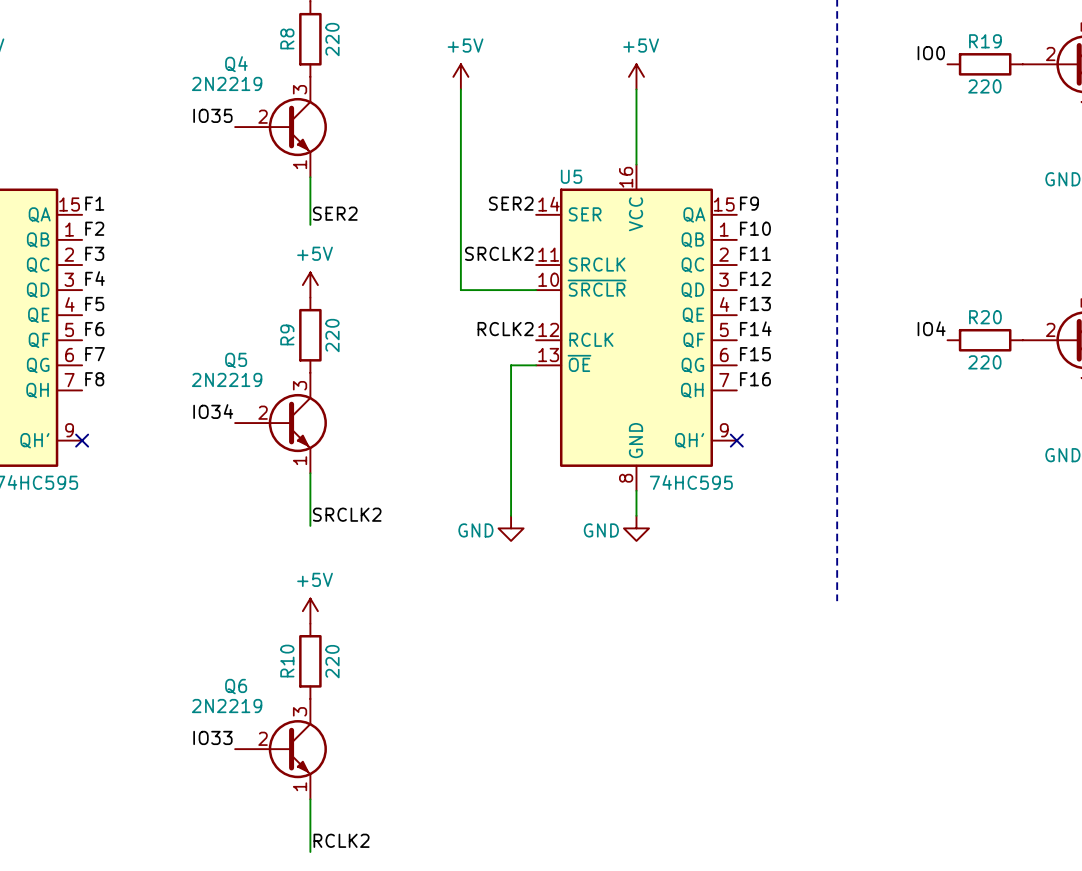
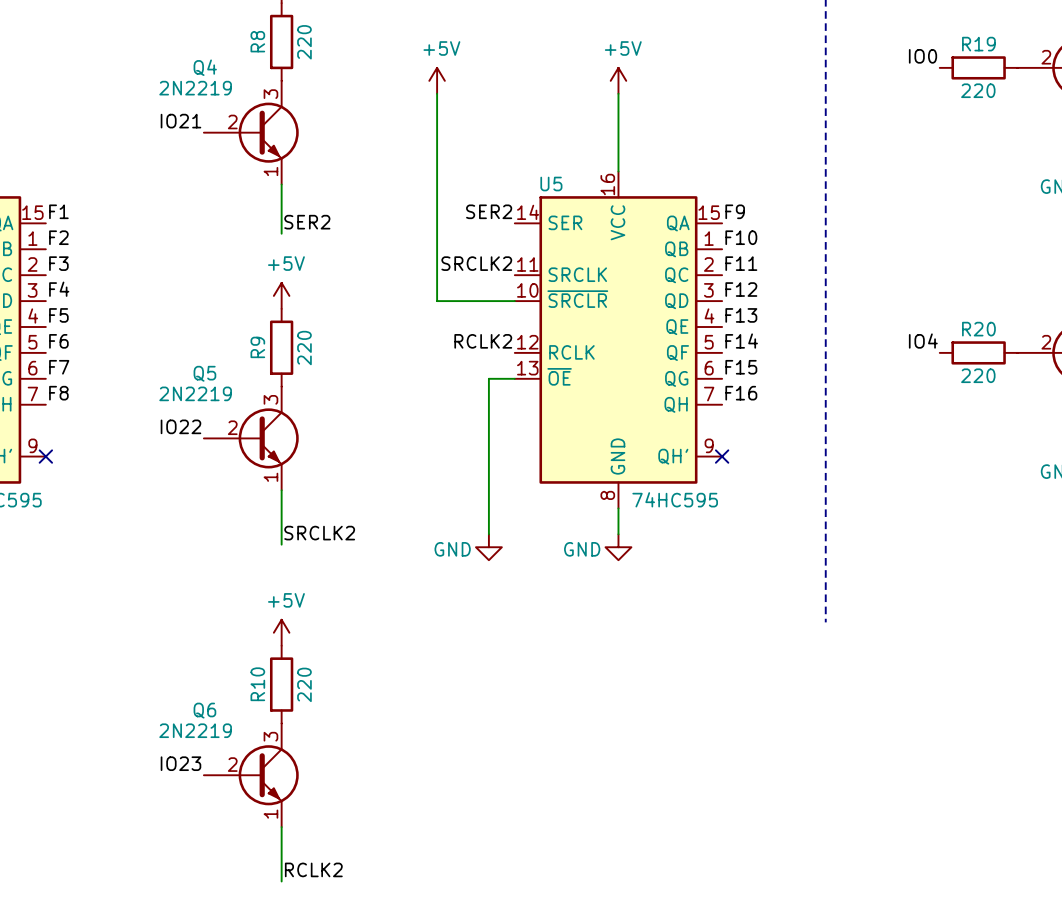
label: IO35 (212, 115) -> IO21 (180, 121)
label: IO34 (213, 411) -> IO22 (180, 426)
label: IO33 (212, 737) -> IO23 (180, 763)

